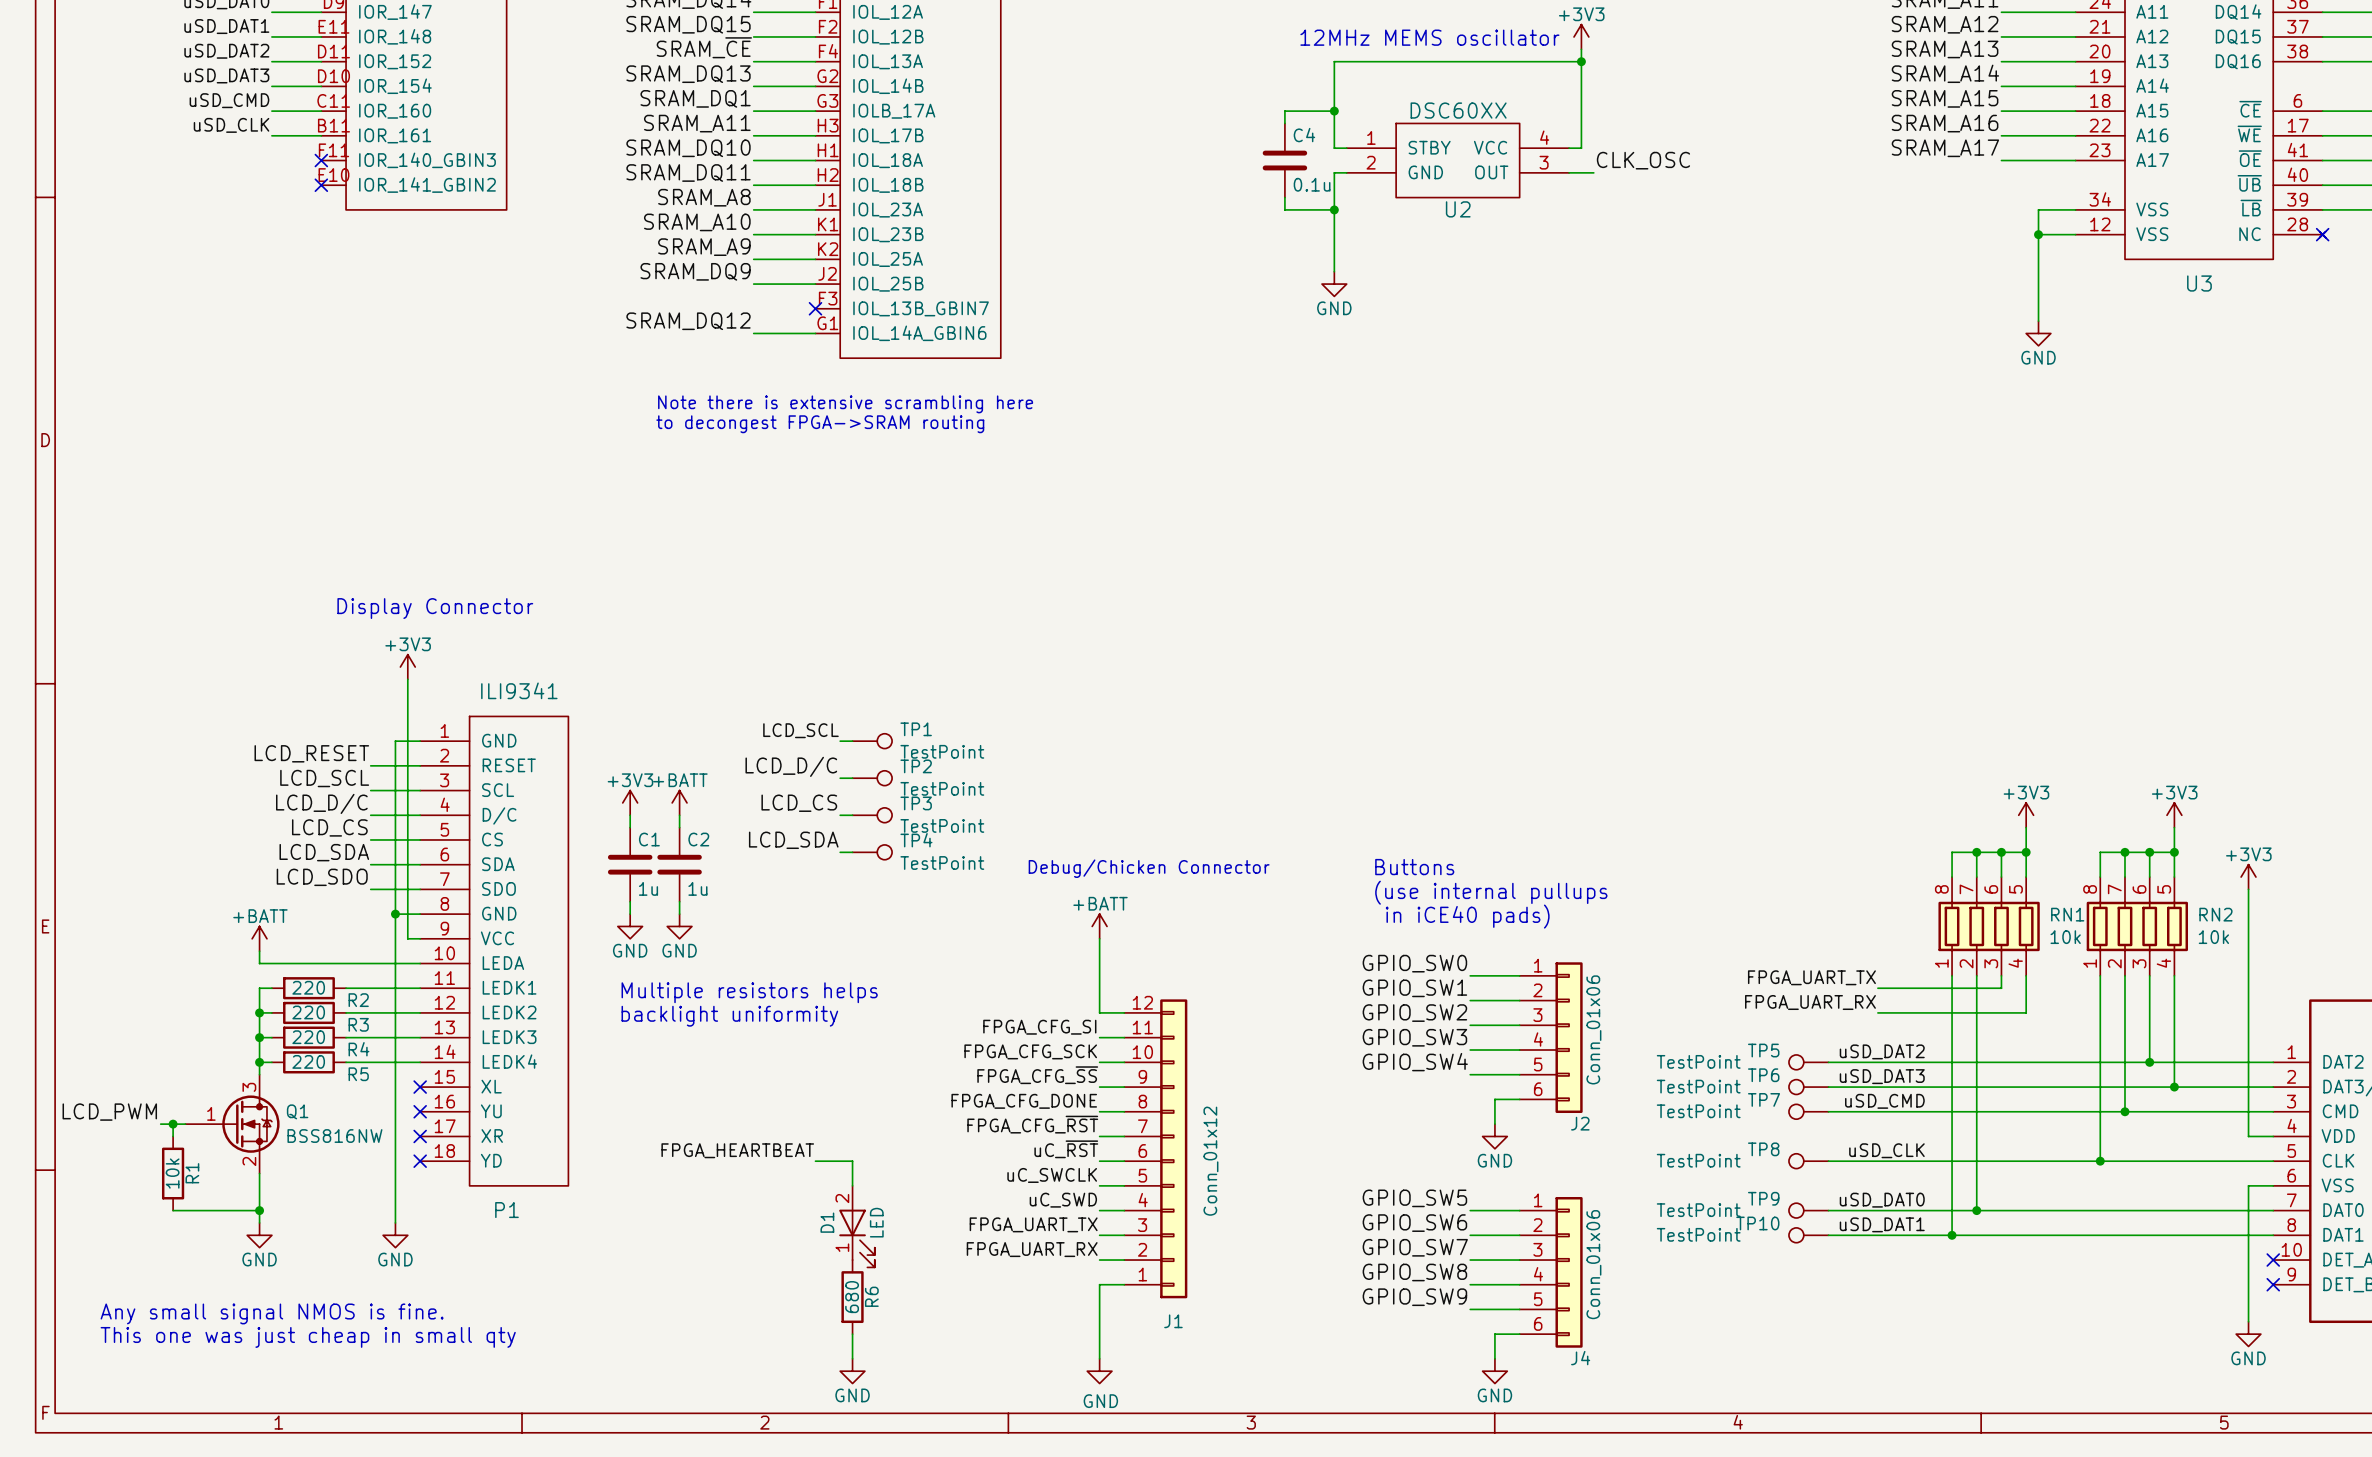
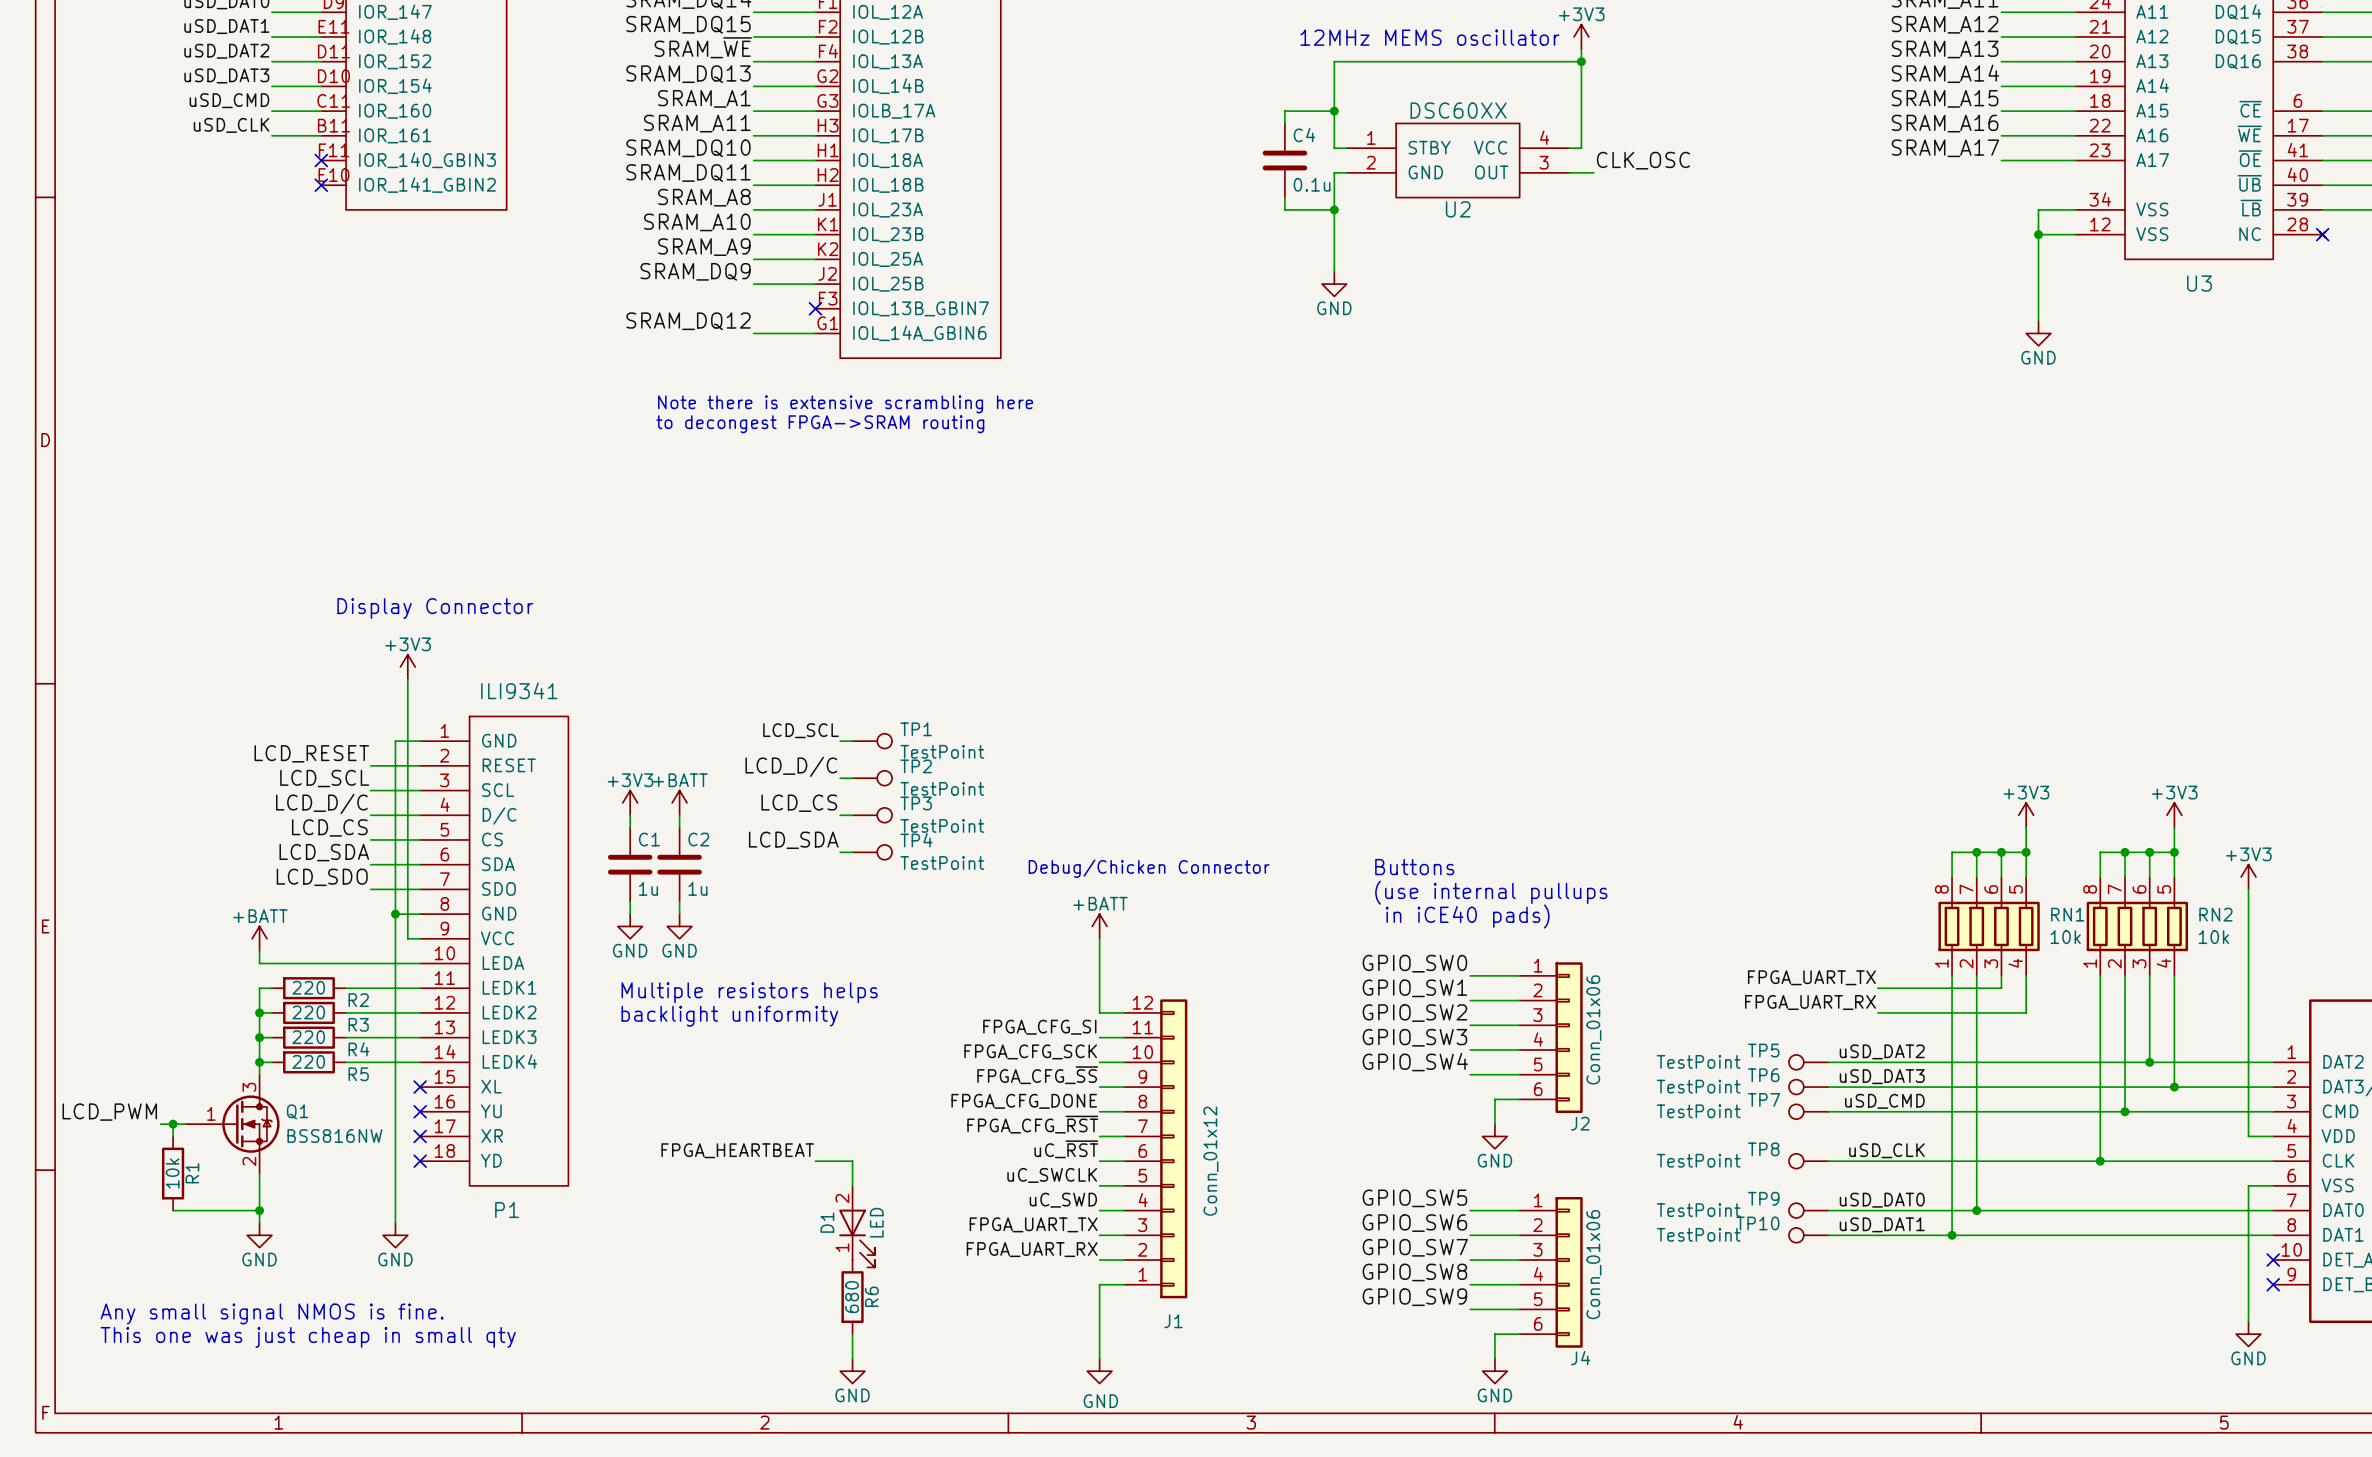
label: SRAM_~{CE} (704, 47) -> SRAM_~{WE} (703, 47)
label: SRAM_DQ1 (695, 98) -> SRAM_A1 (704, 98)

